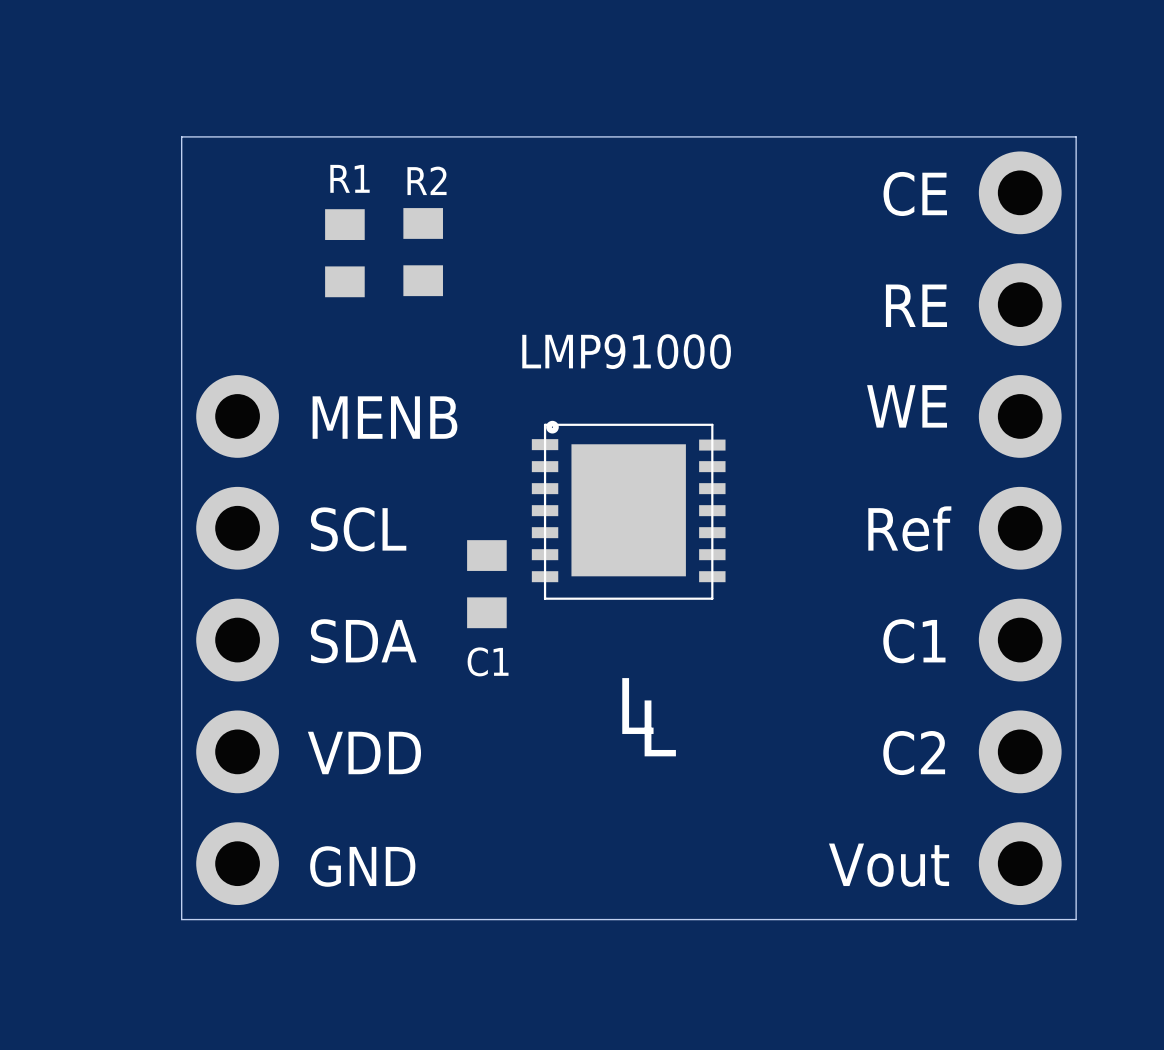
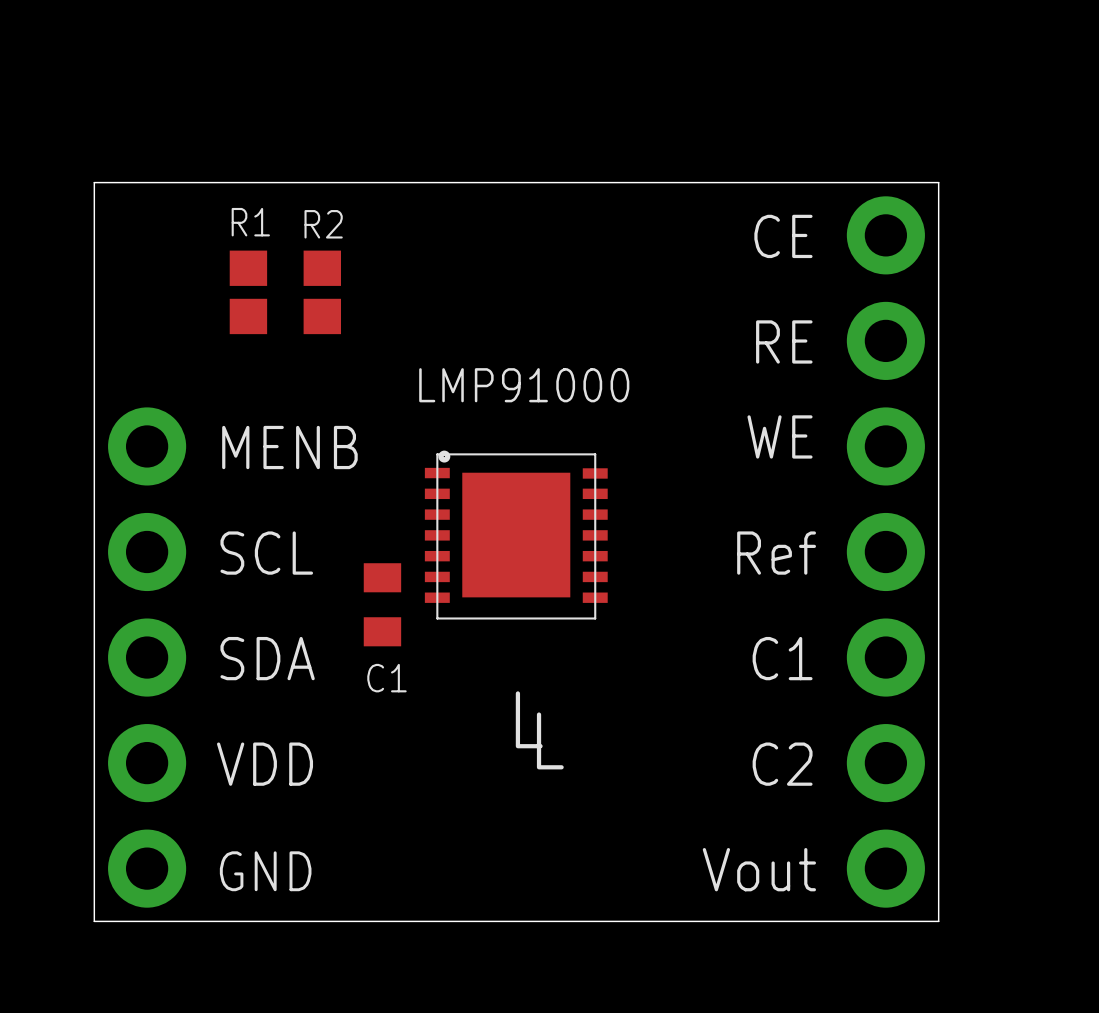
R2 footprint: [403, 208, 443, 297] -> [303, 250, 341, 335]
R1 footprint: [325, 209, 365, 298] -> [229, 250, 268, 335]

